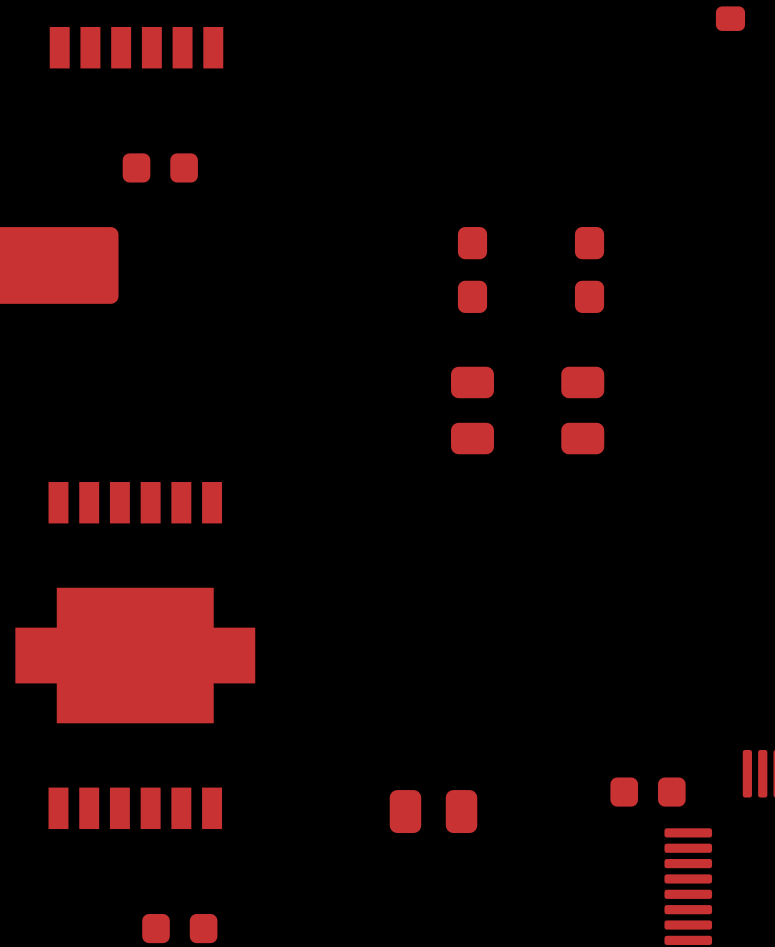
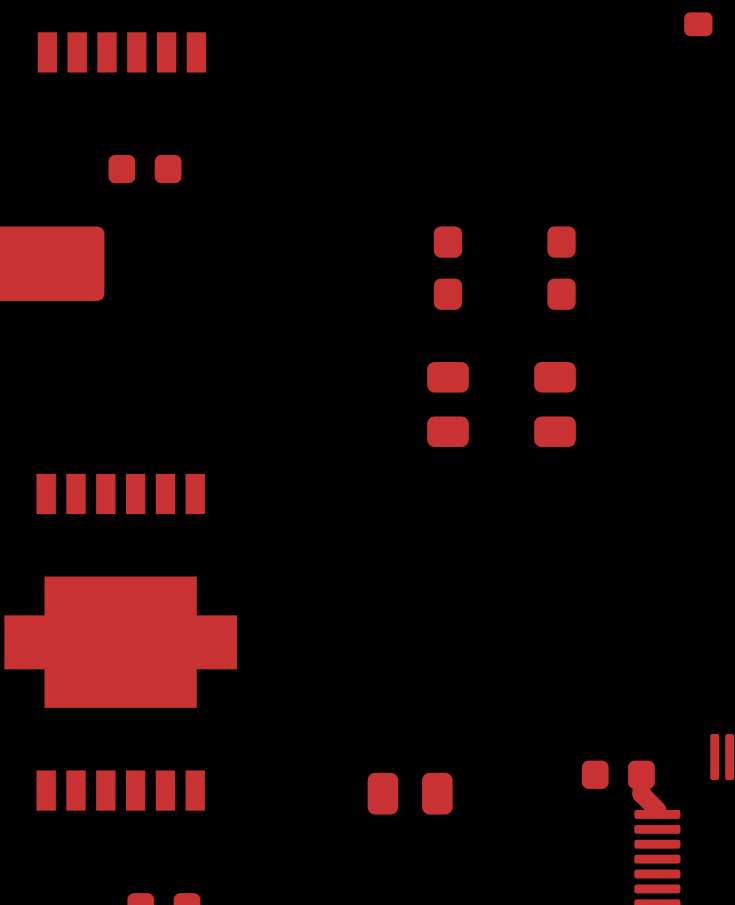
top track: none -> (641, 774) (641, 793) (657, 809)

